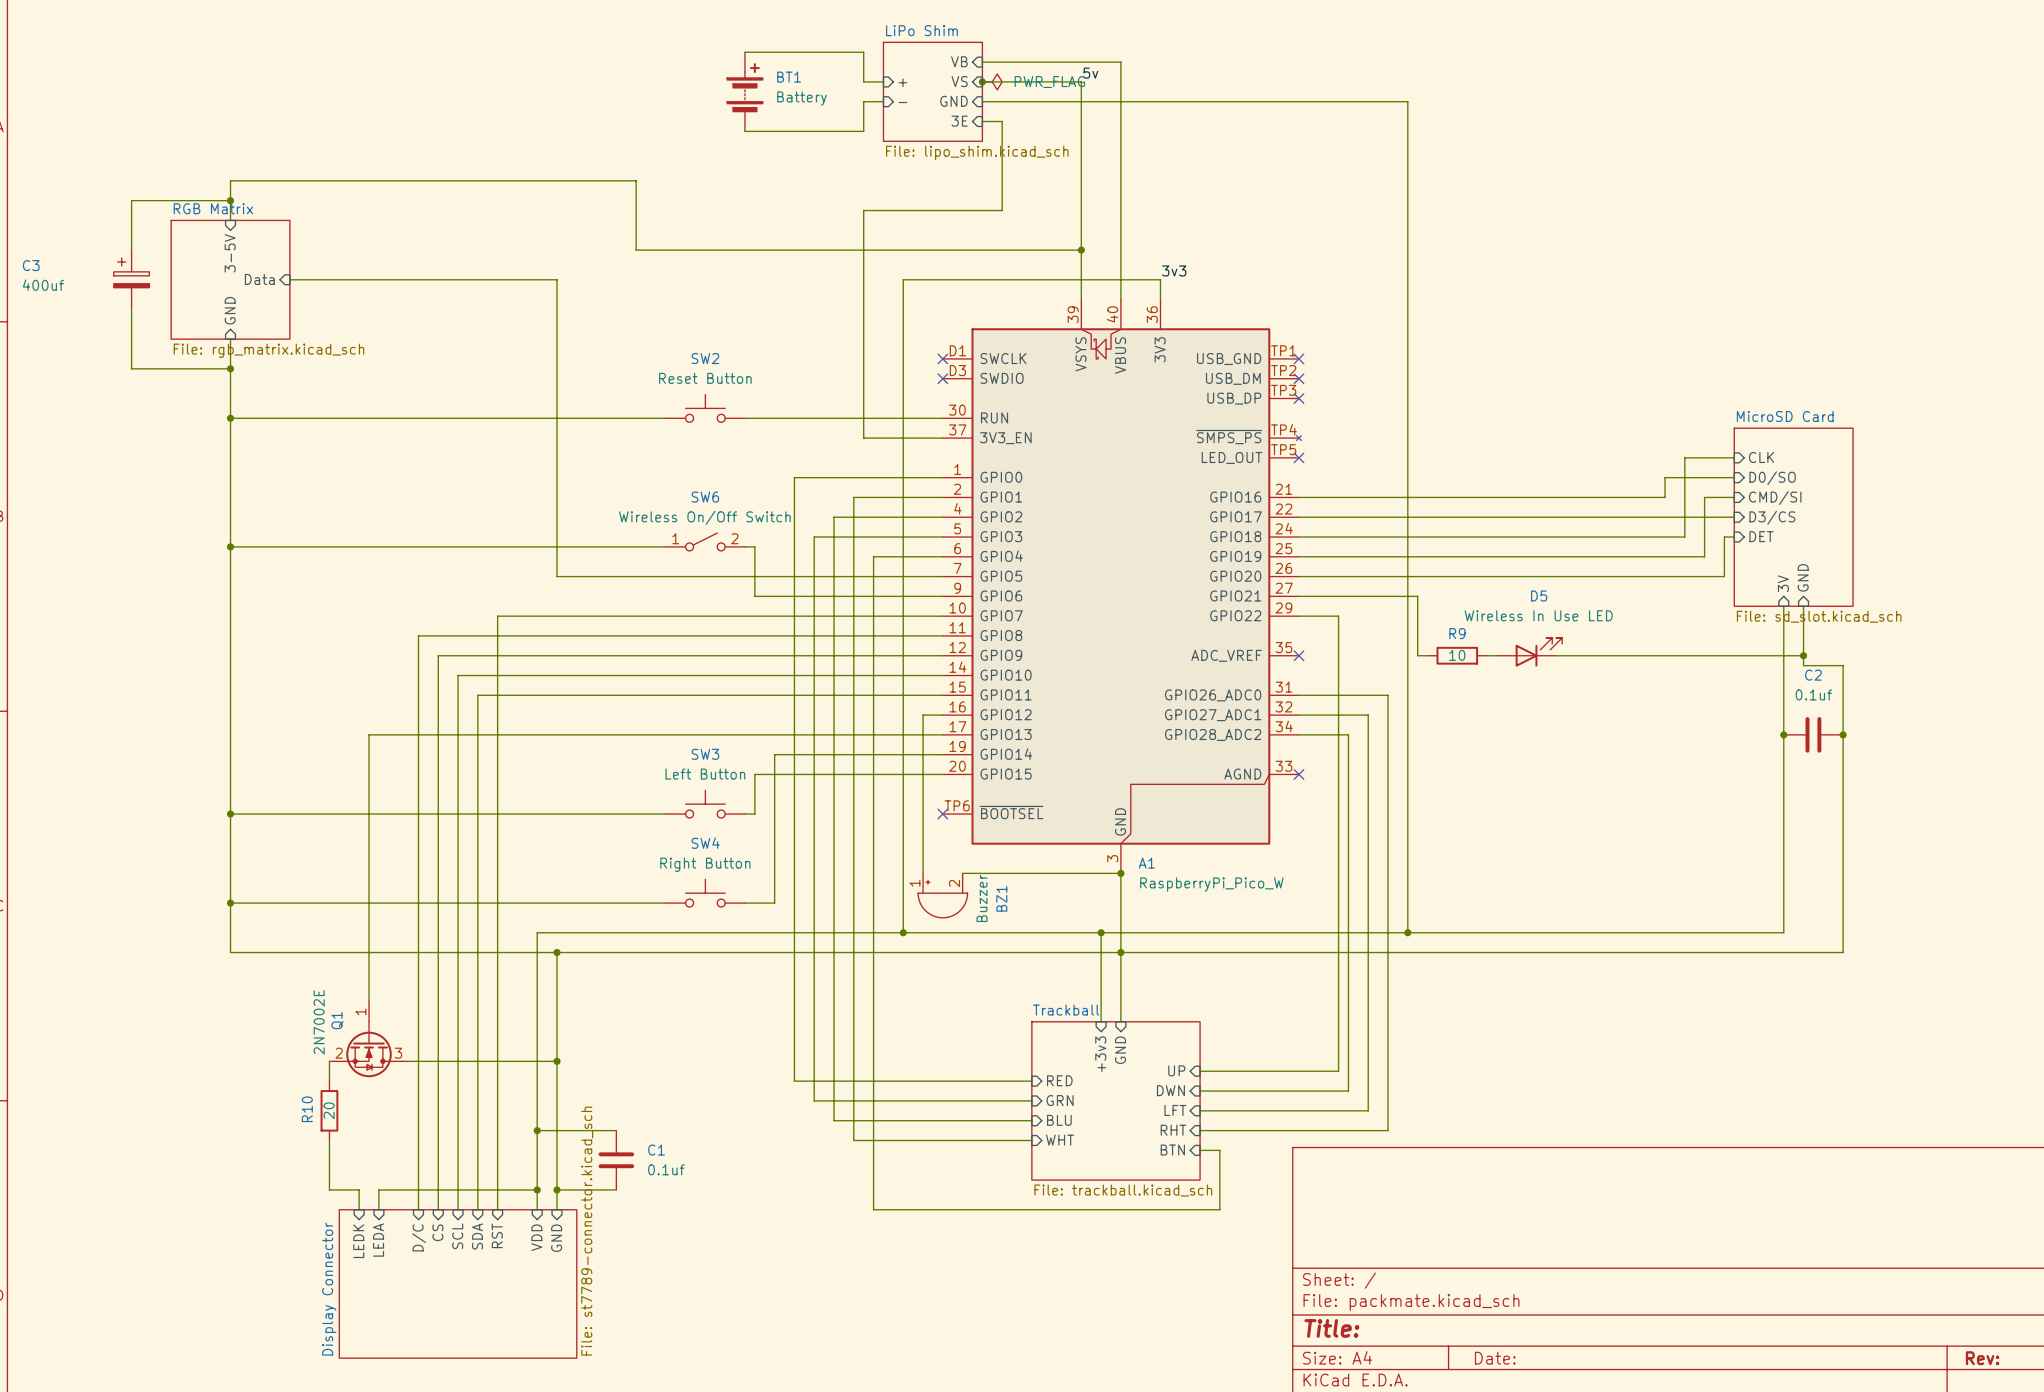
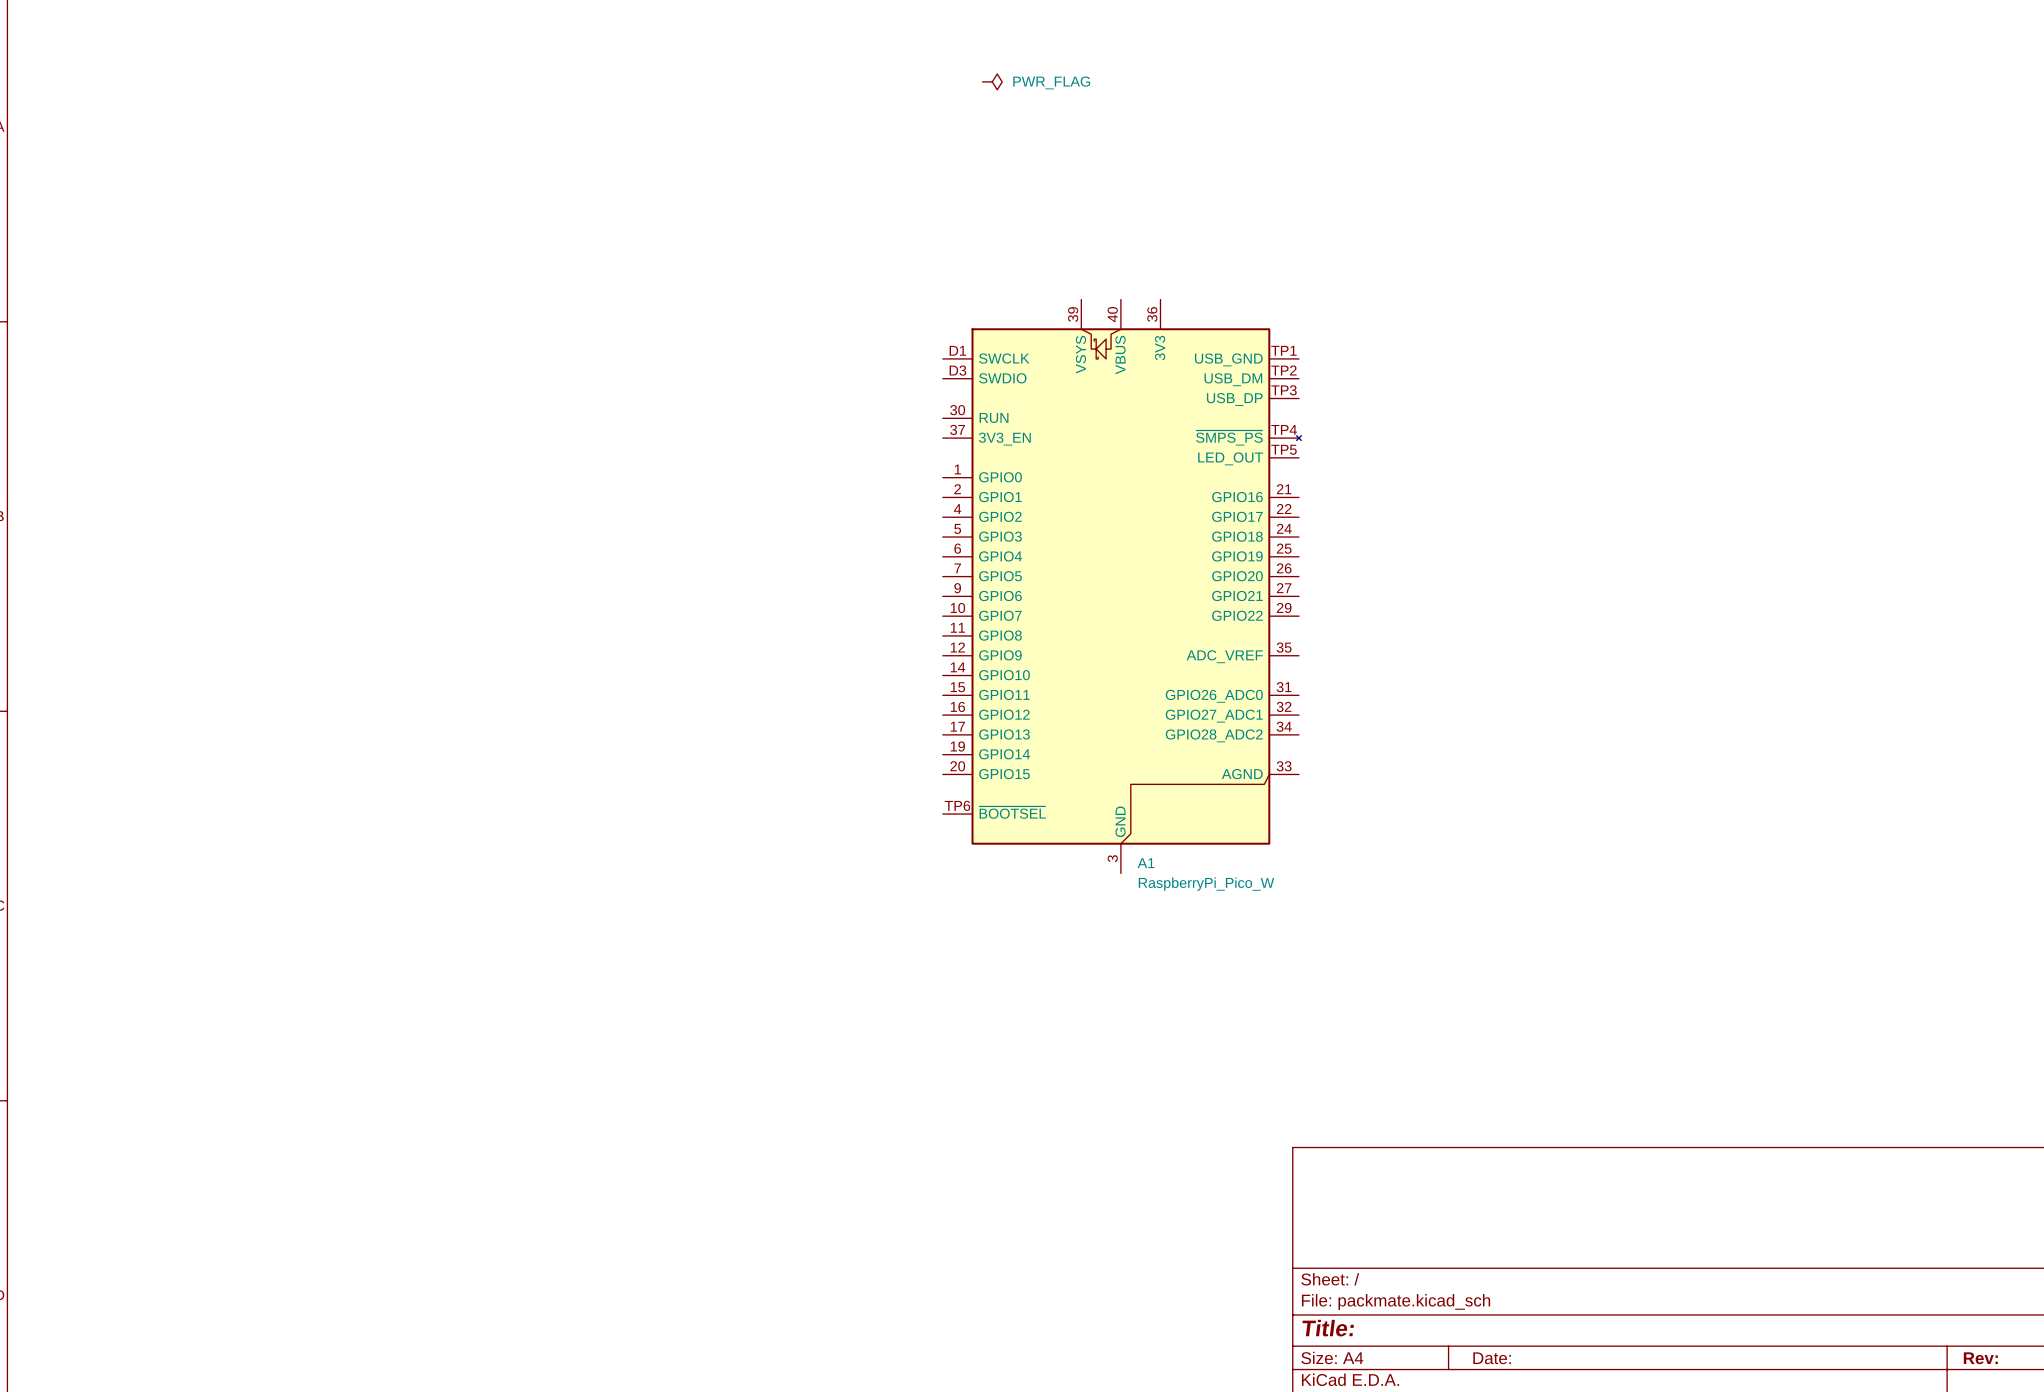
wire: (744, 52) (863, 52) (863, 81) (883, 81) -> none
sheet pin: VB (959, 61) -> none
wire: (982, 62) (1120, 62) (1120, 299) -> none
label: 5v (1090, 73) -> none
sheet pin: VS (959, 81) -> none
wire: (982, 81) (1081, 81) (1081, 299) -> none
junction: (982, 81) -> none
sheet pin: + (902, 82) -> none
BT1: Battery (744, 91) -> none
sheet LiPo Shim: File: lipo_shim.kicad_sch (932, 91) -> none
wire: (883, 101) (863, 101) (863, 131) (744, 131) -> none
sheet pin: GND (953, 101) -> none
wire: (982, 101) (1407, 101) (1407, 932) -> none
sheet pin: - (902, 102) -> none
sheet pin: 3E (959, 121) -> none
wire: (982, 121) (1002, 121) (1002, 210) (863, 210) (863, 438) (942, 438) -> none
wire: (230, 200) (131, 200) (131, 250) -> none
junction: (230, 200) -> none
wire: (230, 220) (230, 180) (636, 180) (636, 250) (1081, 250) -> none
junction: (1081, 250) -> none
sheet pin: 3-5V (230, 253) -> none
label: 3v3 (1174, 270) -> none
C3: 400uf (131, 279) -> none
sheet RGB Matrix: File: rgb_matrix.kicad_sch (230, 279) -> none
sheet pin: Data (259, 279) -> none
wire: (289, 279) (556, 279) (556, 576) (942, 576) -> none
wire: (1160, 299) (1160, 279) (903, 279) (903, 932) -> none
wire: (131, 309) (131, 368) (230, 368) -> none
sheet pin: GND (230, 310) -> none
wire: (230, 339) (230, 952) (1843, 952) (1843, 665) (1803, 665) (1803, 606) -> none
no-connect mark: (942, 358) -> none
no-connect mark: (1298, 358) -> none
junction: (230, 368) -> none
no-connect mark: (942, 378) -> none
no-connect mark: (1298, 378) -> none
no-connect mark: (1298, 398) -> none
SW2: Reset Button (705, 408) -> none
wire: (230, 418) (665, 418) -> none
junction: (230, 418) -> none
wire: (744, 418) (942, 418) -> none
no-connect mark: (1298, 457) -> none
wire: (1734, 457) (1684, 457) (1684, 537) (1298, 537) -> none
sheet pin: CLK (1761, 457) -> none
wire: (942, 477) (794, 477) (794, 1081) (1031, 1081) -> none
wire: (1734, 477) (1665, 477) (1665, 497) (1298, 497) -> none
sheet pin: D0/SO (1772, 478) -> none
wire: (942, 497) (853, 497) (853, 1140) (1031, 1140) -> none
wire: (1734, 497) (1704, 497) (1704, 556) (1298, 556) -> none
sheet pin: CMD/SI (1775, 498) -> none
wire: (942, 517) (834, 517) (834, 1120) (1031, 1120) -> none
wire: (1298, 517) (1734, 517) -> none
sheet pin: D3/CS (1772, 517) -> none
sheet MicroSD Card: File: sd_slot.kicad_sch (1793, 517) -> none
sheet pin: DET (1761, 536) -> none
wire: (942, 537) (814, 537) (814, 1100) (1031, 1100) -> none
wire: (1734, 537) (1724, 537) (1724, 576) (1298, 576) -> none
SW6: Wireless On/Off Switch (705, 541) -> none
wire: (230, 546) (665, 546) -> none
junction: (230, 546) -> none
wire: (744, 546) (754, 546) (754, 596) (942, 596) -> none
wire: (942, 556) (873, 556) (873, 1209) (1219, 1209) (1219, 1150) (1200, 1150) -> none
sheet pin: GND (1803, 577) -> none
sheet pin: 3V (1783, 583) -> none
wire: (1298, 596) (1417, 596) (1417, 655) (1427, 655) -> none
wire: (1783, 606) (1783, 932) (537, 932) (537, 1209) -> none
wire: (942, 616) (497, 616) (497, 1209) -> none
wire: (1298, 616) (1338, 616) (1338, 1071) (1200, 1071) -> none
wire: (942, 635) (418, 635) (418, 1209) -> none
D5: Wireless In Use LED (1529, 652) -> none
wire: (942, 655) (438, 655) (438, 1209) -> none
no-connect mark: (1298, 655) -> none
R9: 10 (1457, 655) -> none
wire: (1486, 655) (1496, 655) -> none
wire: (1556, 655) (1803, 655) -> none
junction: (1803, 655) -> none
wire: (942, 675) (458, 675) (458, 1209) -> none
wire: (942, 695) (477, 695) (477, 1209) -> none
wire: (1298, 695) (1388, 695) (1388, 1130) (1200, 1130) -> none
wire: (942, 715) (923, 715) (923, 873) -> none
wire: (1298, 715) (1368, 715) (1368, 1110) (1200, 1110) -> none
wire: (942, 734) (369, 734) (369, 1002) -> none
wire: (1298, 734) (1348, 734) (1348, 1091) (1200, 1091) -> none
junction: (1783, 734) -> none
C2: 0.1uf (1813, 734) -> none
junction: (1843, 734) -> none
wire: (942, 754) (774, 754) (774, 903) (744, 903) -> none
wire: (942, 774) (754, 774) (754, 814) (744, 814) -> none
no-connect mark: (1298, 774) -> none
SW3: Left Button (705, 804) -> none
wire: (230, 814) (665, 814) -> none
junction: (230, 814) -> none
no-connect mark: (942, 814) -> none
wire: (962, 873) (1120, 873) (1120, 1021) -> none
junction: (1120, 873) -> none
SW4: Right Button (705, 893) -> none
BZ1: Buzzer (942, 895) -> none
wire: (230, 903) (665, 903) -> none
junction: (230, 903) -> none
junction: (903, 932) -> none
wire: (1101, 932) (1101, 1021) -> none
junction: (1101, 932) -> none
junction: (1407, 932) -> none
wire: (556, 952) (556, 1209) -> none
junction: (556, 952) -> none
junction: (1120, 952) -> none
Q1: 2N7002E (369, 1039) -> none
sheet pin: GND (1120, 1050) -> none
sheet pin: +3v3 (1100, 1054) -> none
wire: (329, 1061) (329, 1081) -> none
wire: (408, 1061) (556, 1061) -> none
junction: (556, 1061) -> none
sheet pin: UP (1176, 1070) -> none
sheet pin: RED (1059, 1080) -> none
sheet pin: DWN (1170, 1090) -> none
sheet pin: GRN (1060, 1100) -> none
sheet Trackball: File: trackball.kicad_sch (1115, 1100) -> none
R10: 20 (329, 1110) -> none
sheet pin: LFT (1175, 1110) -> none
sheet pin: BLU (1059, 1120) -> none
wire: (537, 1130) (616, 1130) -> none
junction: (537, 1130) -> none
sheet pin: RHT (1173, 1130) -> none
wire: (329, 1140) (329, 1189) (359, 1189) (359, 1209) -> none
sheet pin: WHT (1060, 1140) -> none
sheet pin: BTN (1172, 1150) -> none
C1: 0.1uf (616, 1160) -> none
wire: (537, 1189) (378, 1189) (378, 1209) -> none
junction: (537, 1189) -> none
wire: (556, 1189) (616, 1189) -> none
junction: (556, 1189) -> none
sheet pin: CS (437, 1232) -> none
sheet pin: RST (497, 1235) -> none
sheet pin: SCL (457, 1236) -> none
sheet pin: SDA (477, 1236) -> none
sheet pin: D/C (419, 1237) -> none
sheet pin: VDD (536, 1237) -> none
sheet pin: GND (556, 1238) -> none
sheet pin: LEDA (378, 1240) -> none
sheet pin: LEDK (358, 1241) -> none
sheet Display Connector: File: st7789-connector.kicad_sch (458, 1283) -> none

